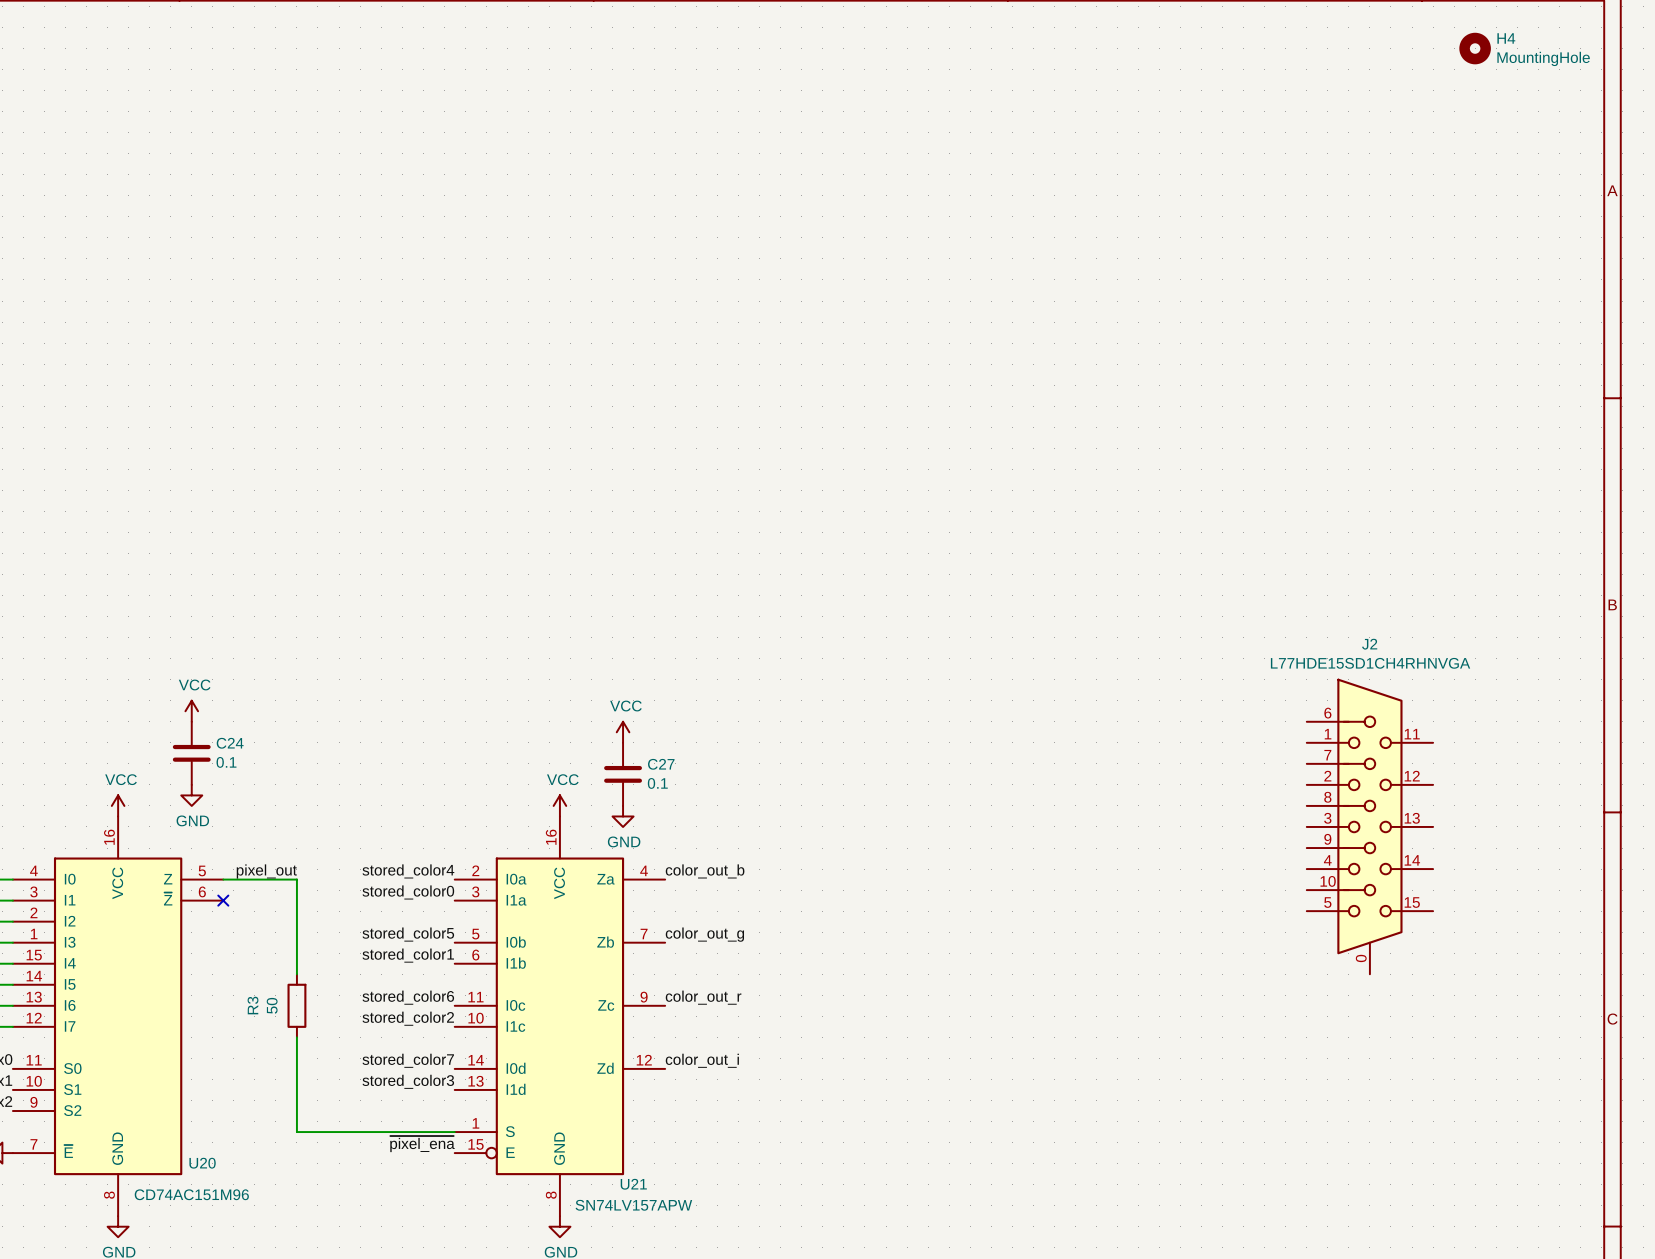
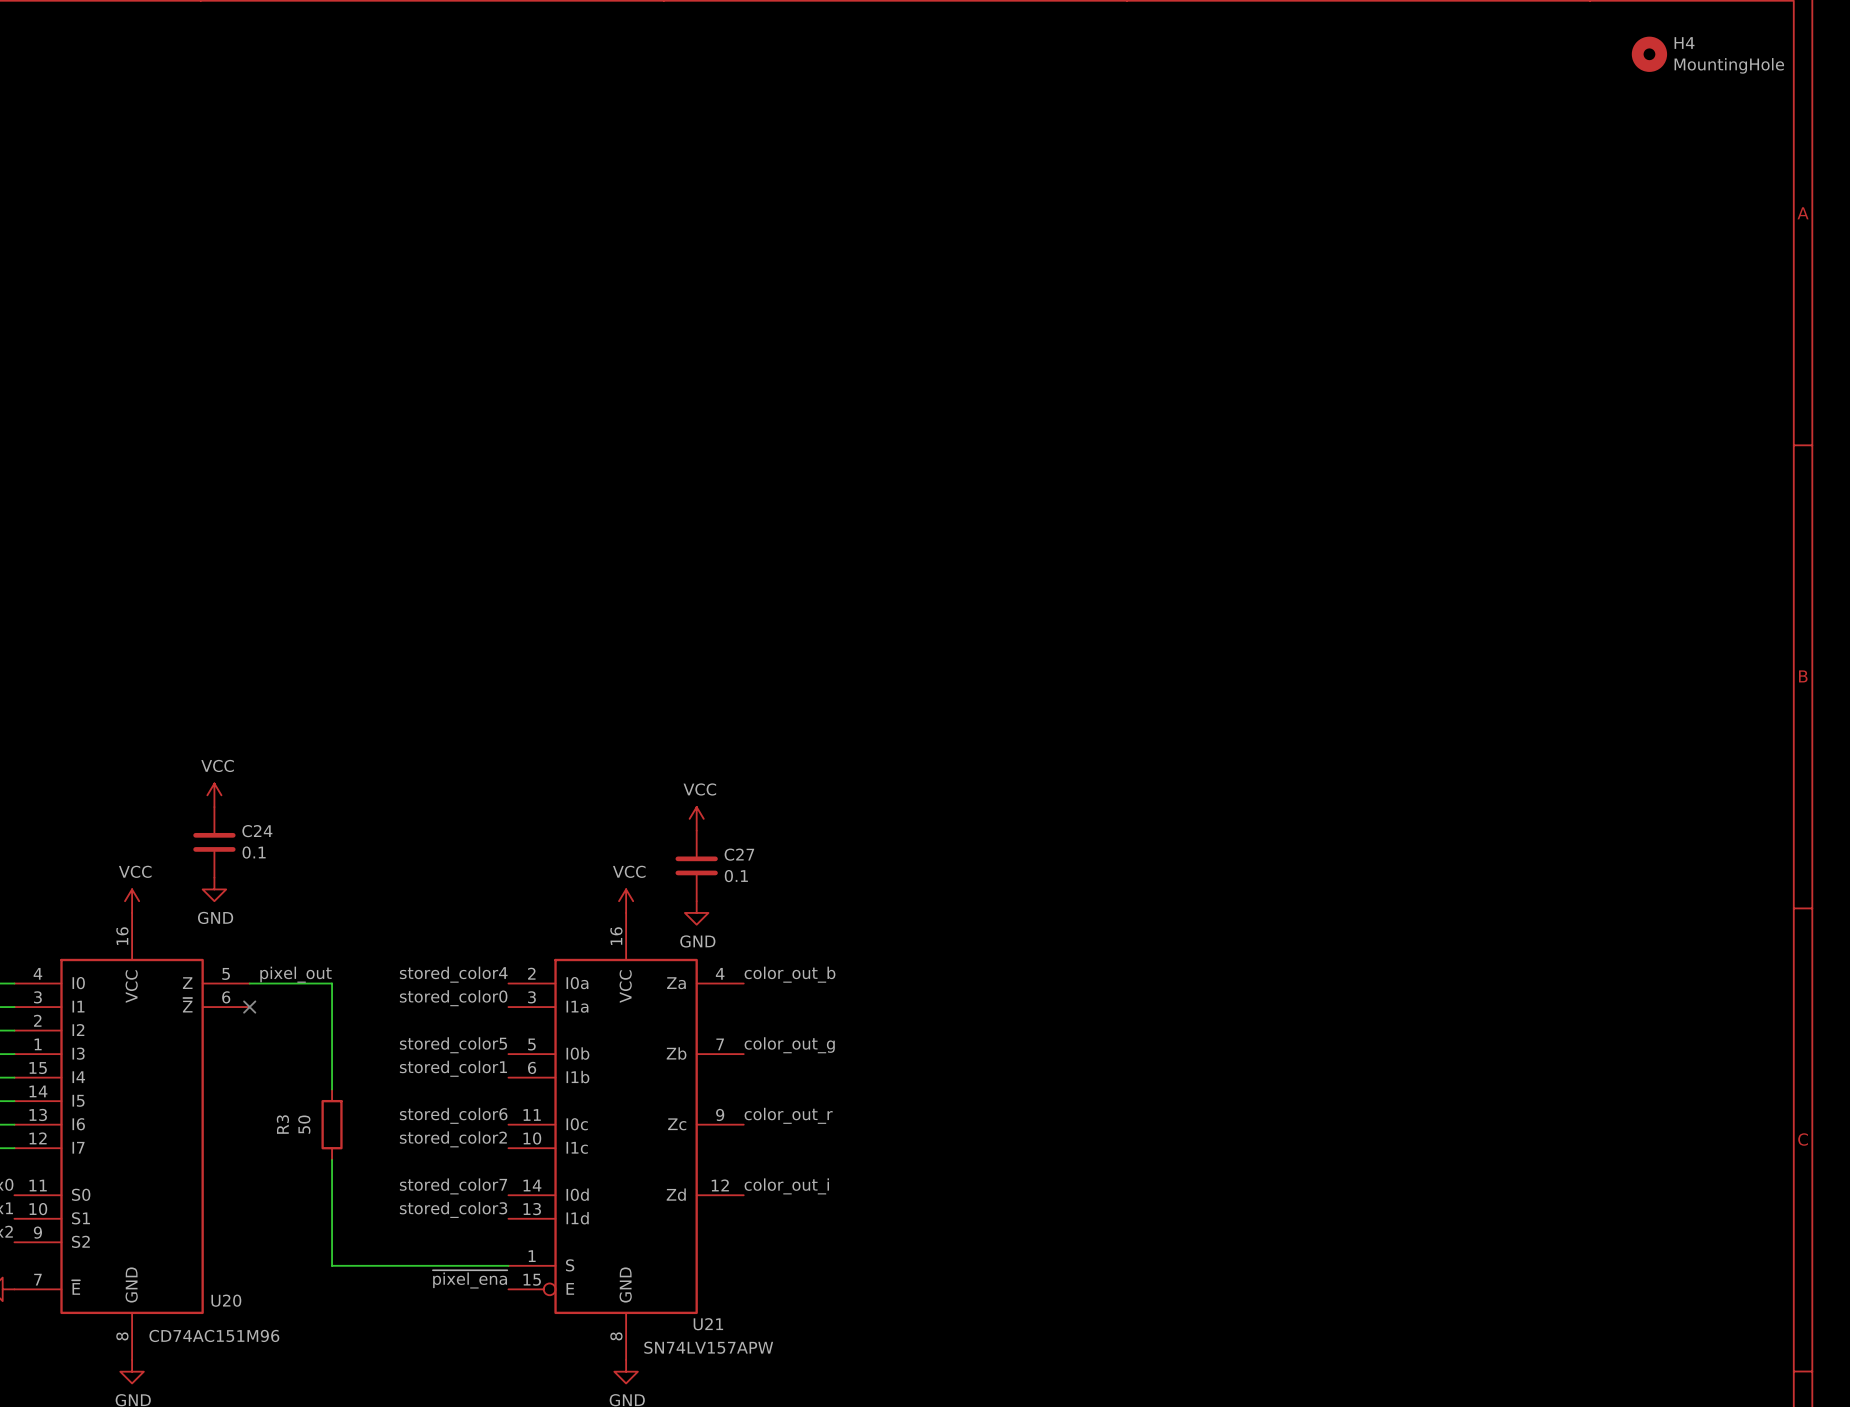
J2: L77HDE15SD1CH4RHNVGA (1369, 826) -> none

